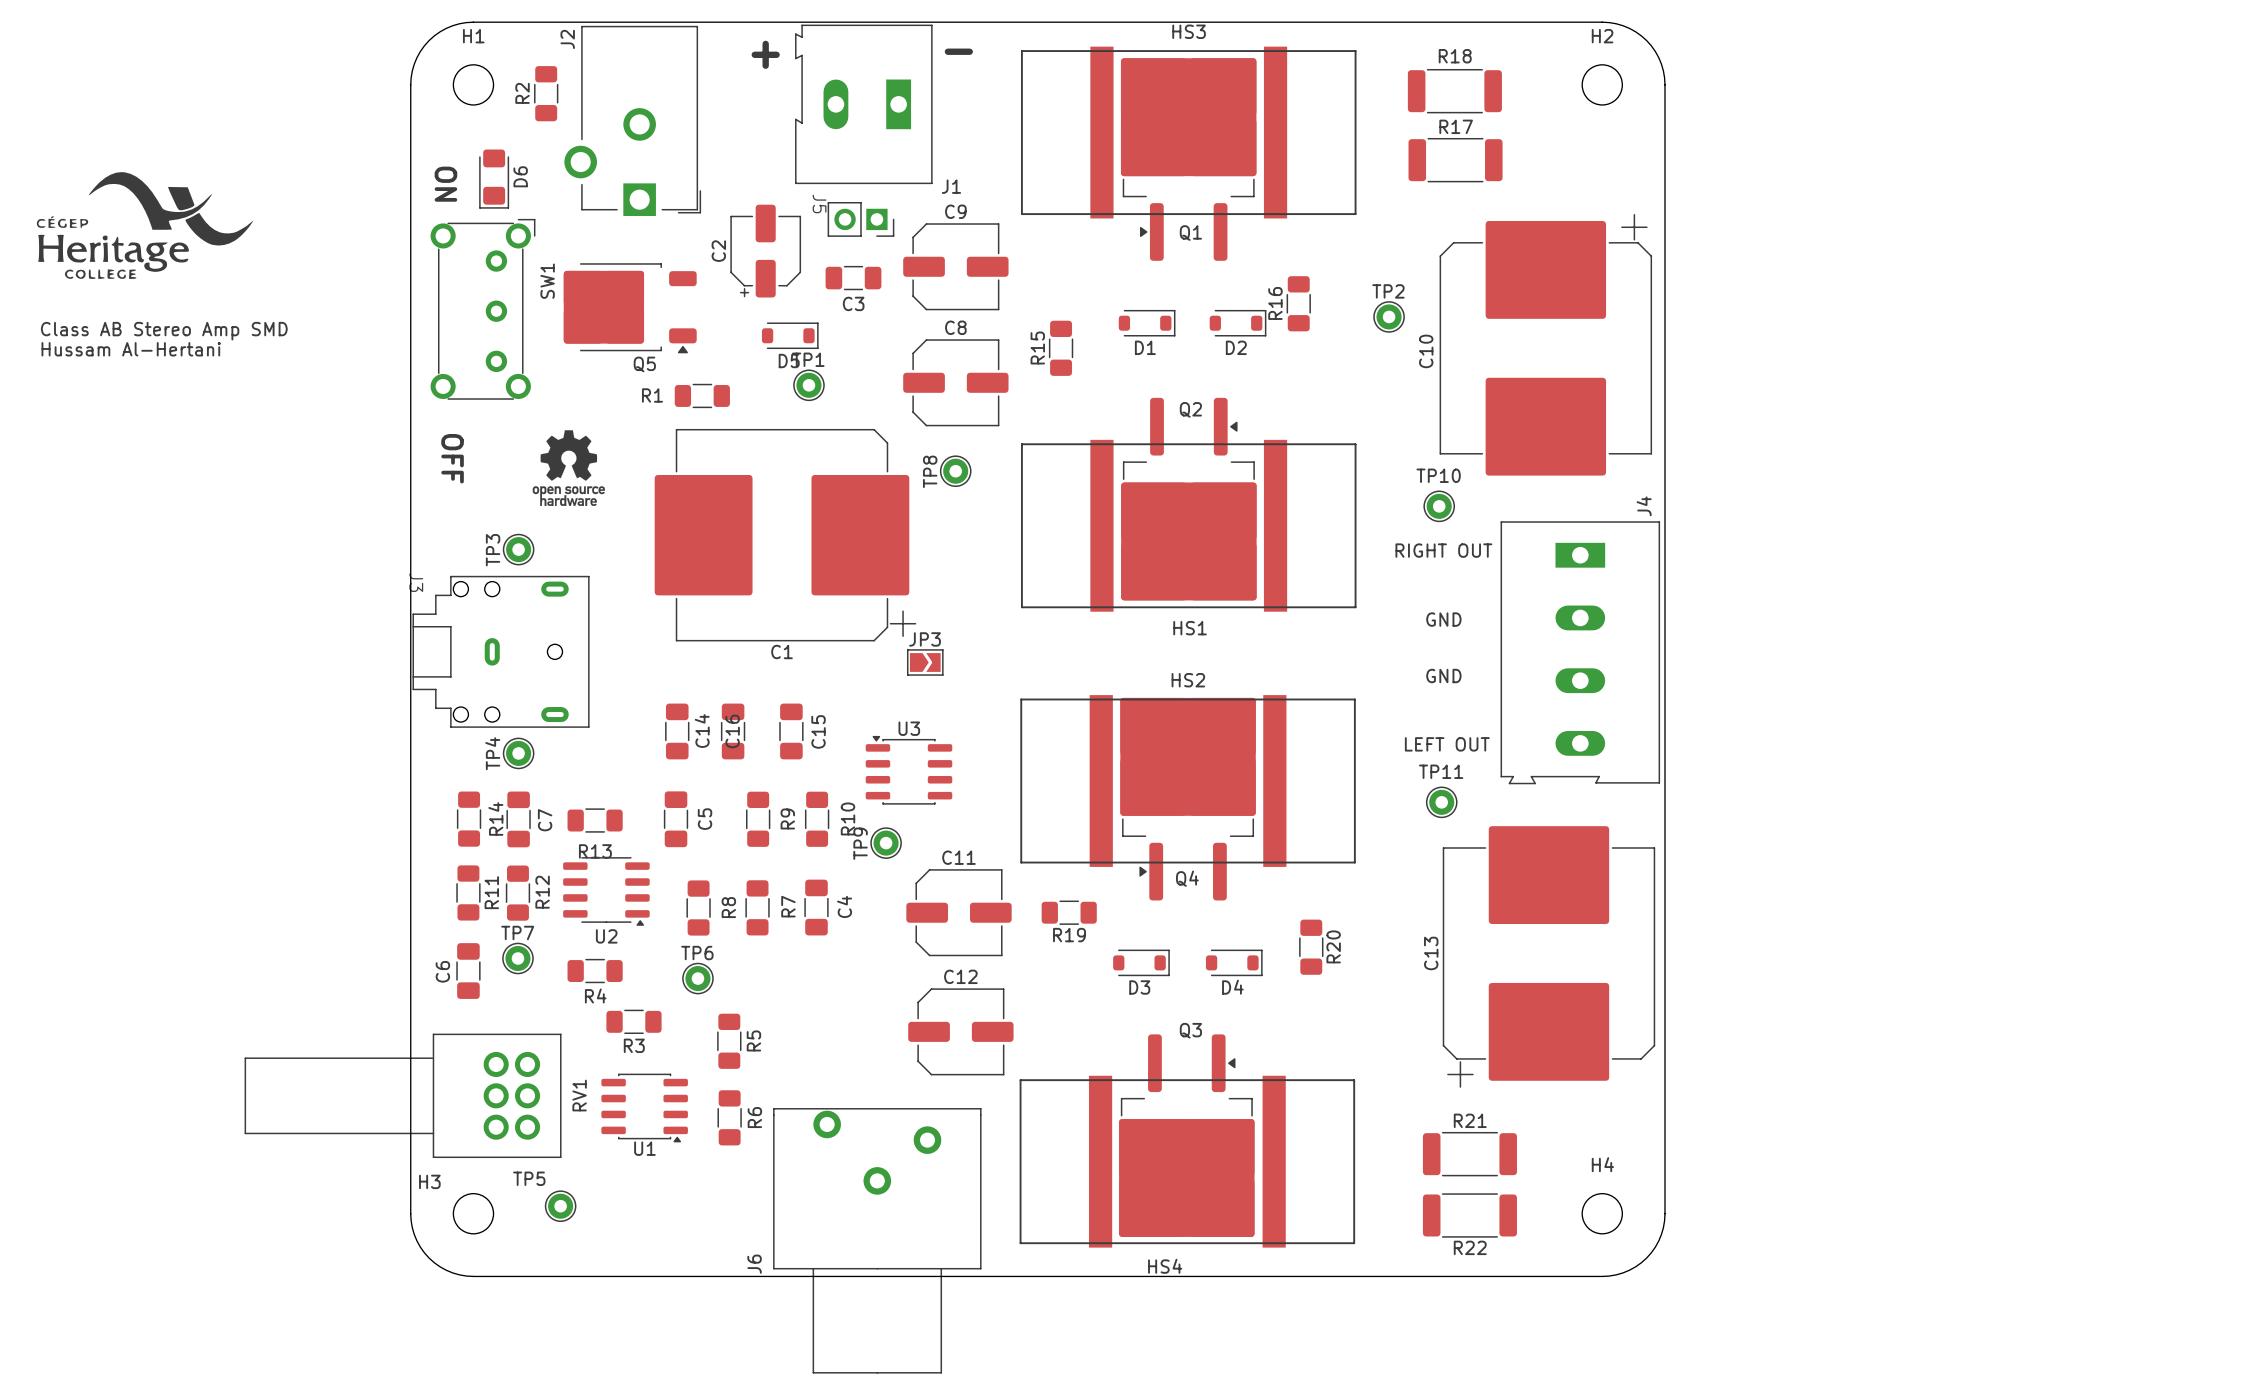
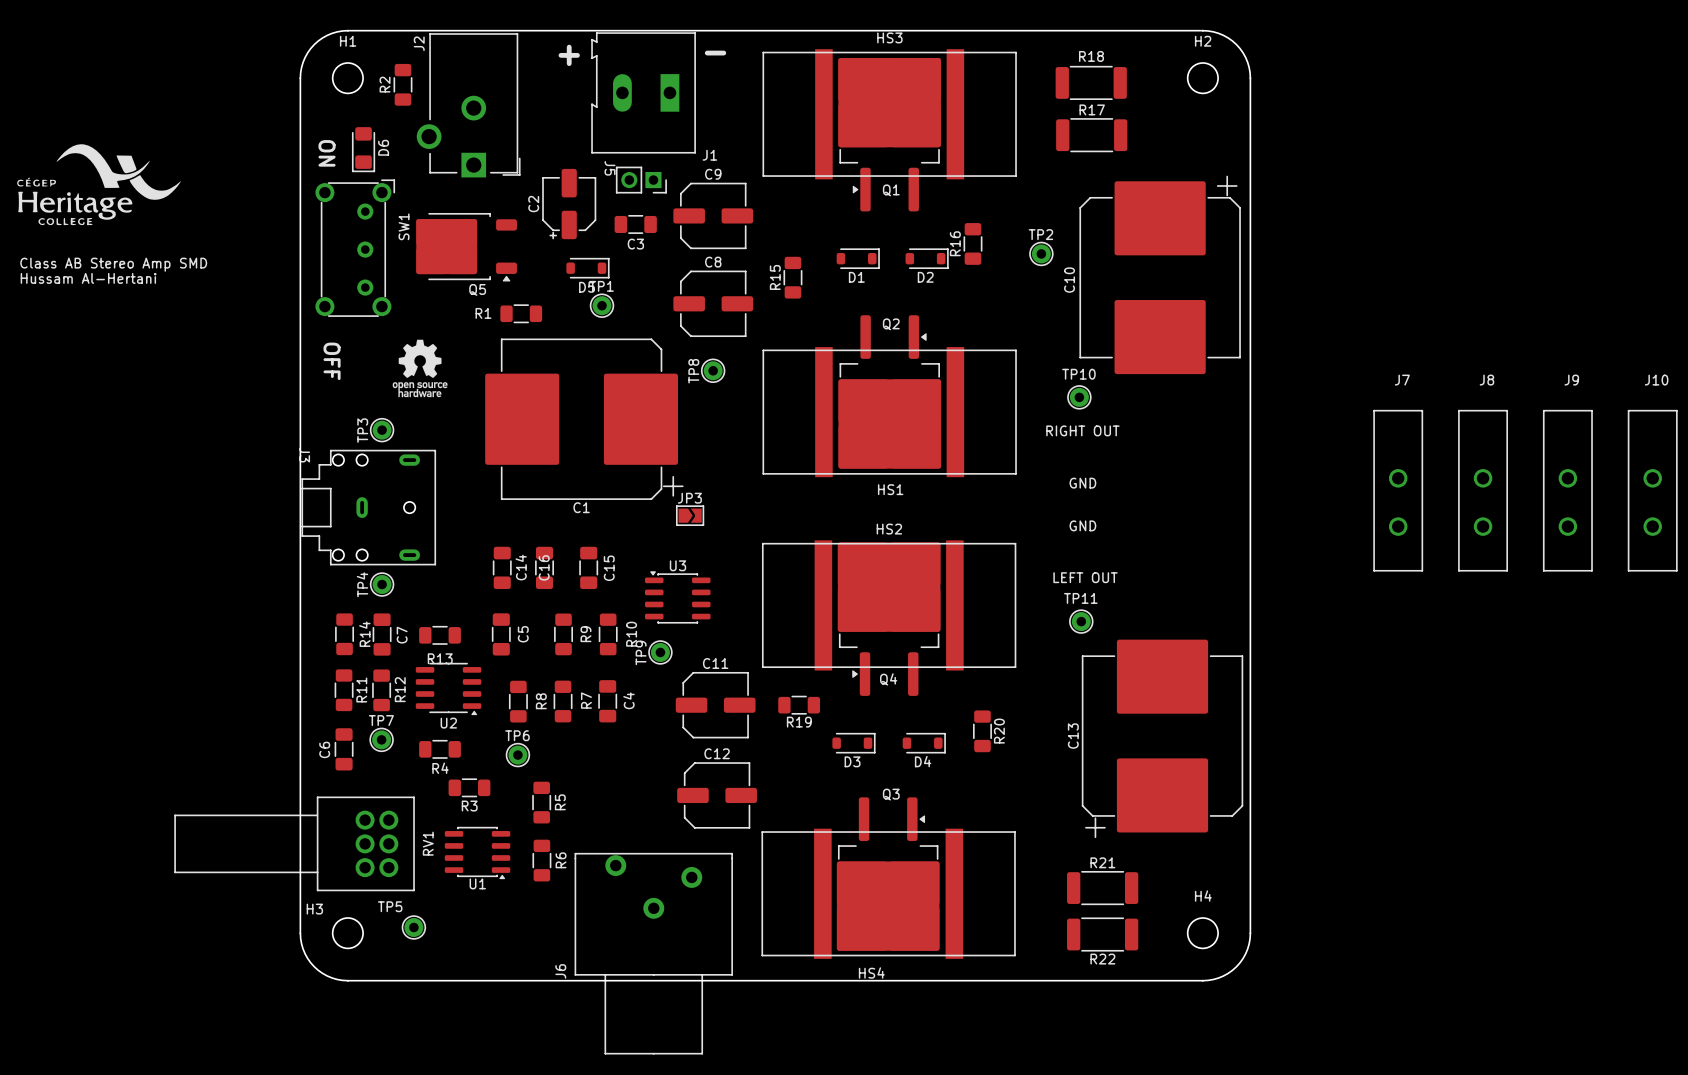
J7: none -> (1398, 490)
J8: none -> (1483, 490)
J9: none -> (1567, 490)
J10: none -> (1652, 490)
J4: (1580, 652) -> none

